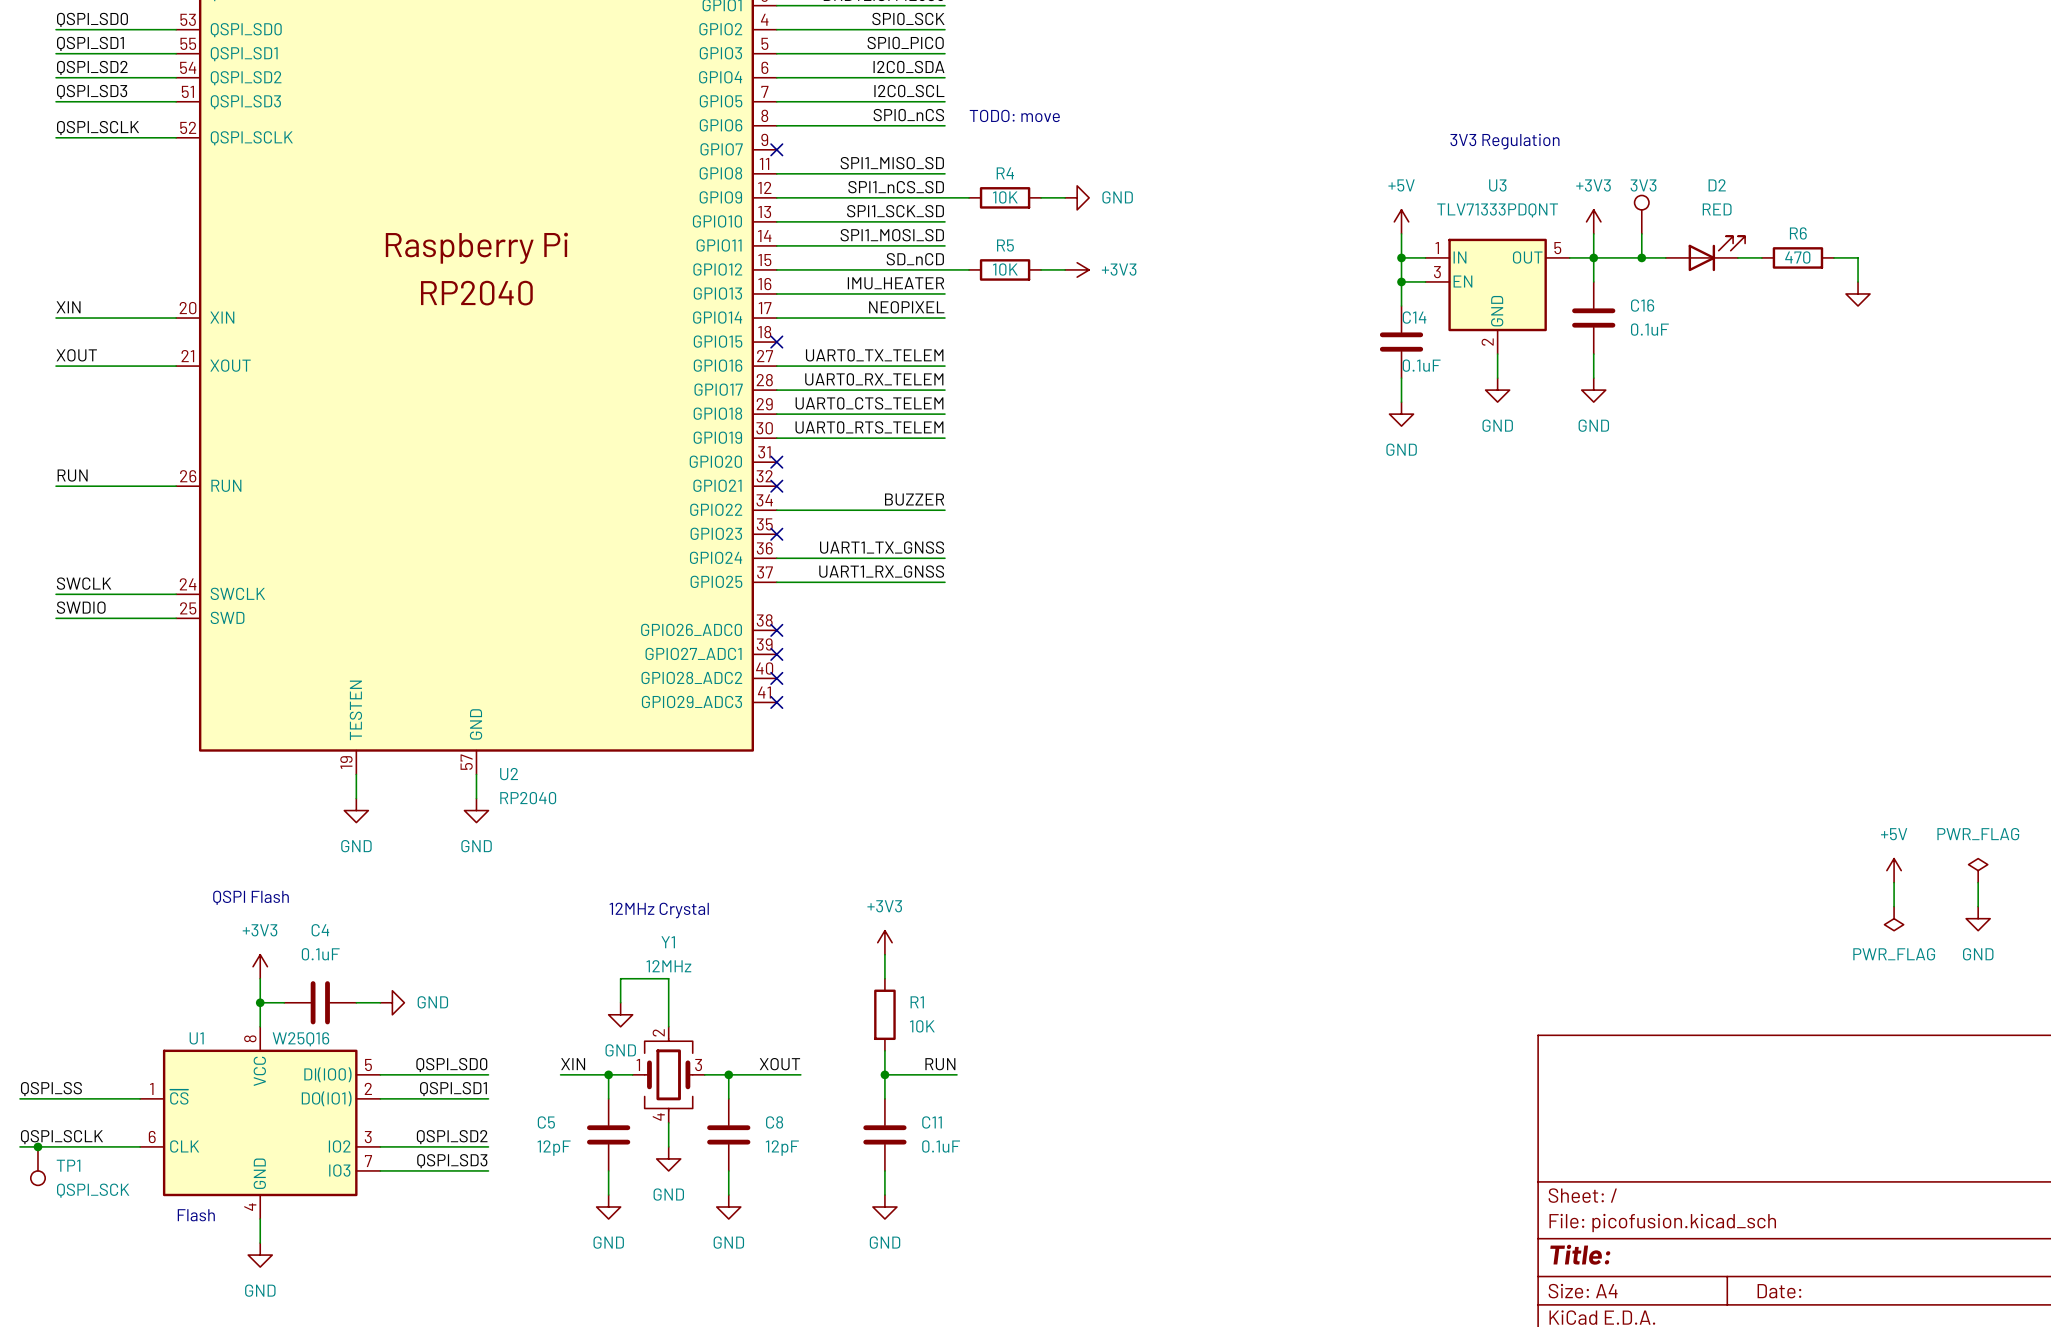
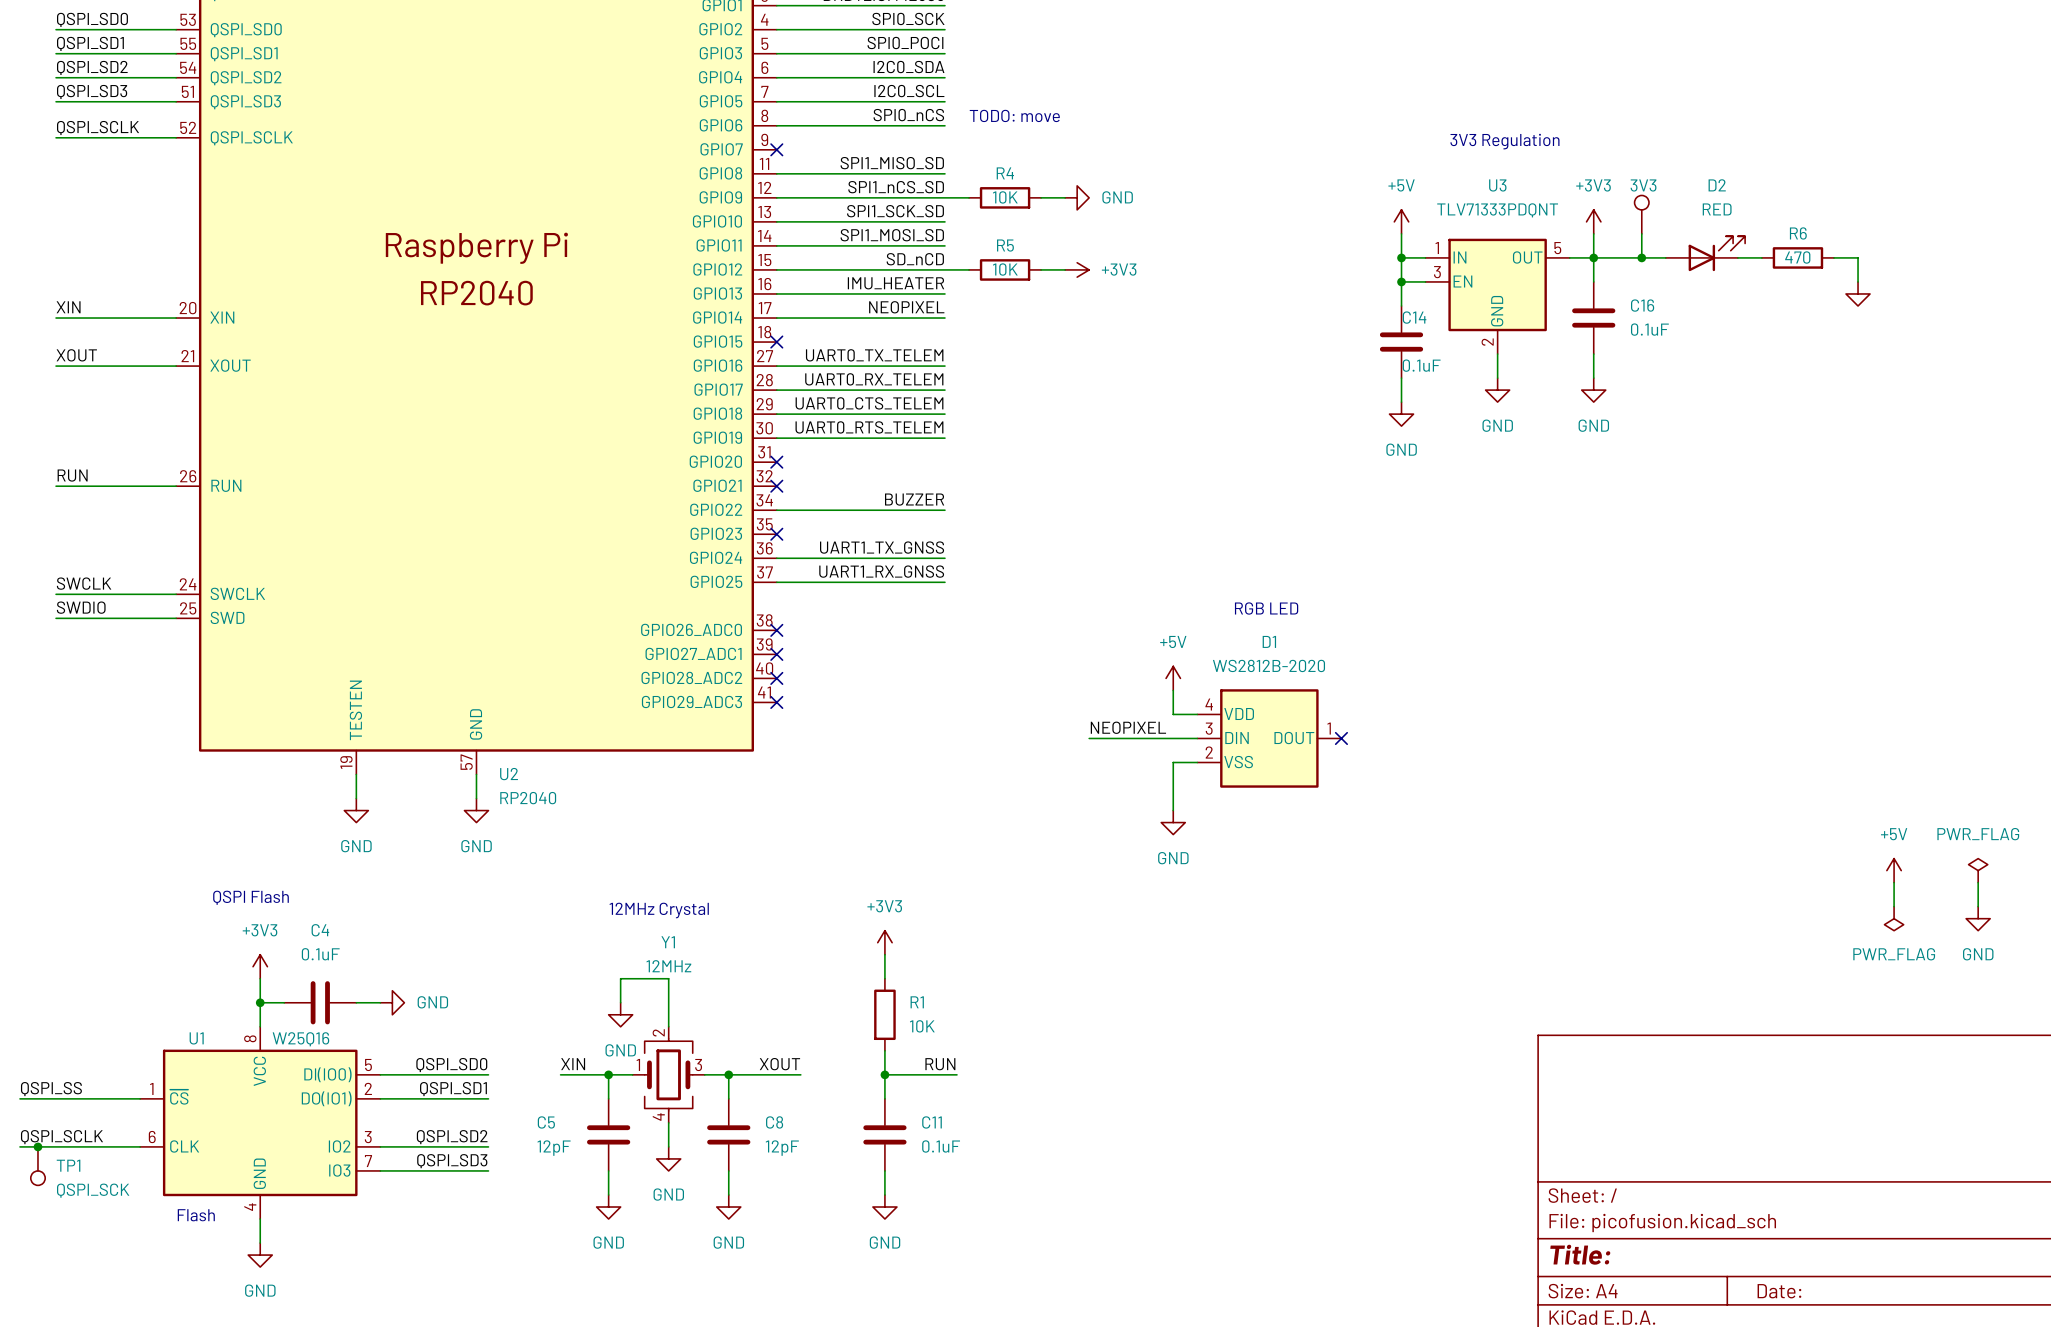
label: SPI0_PICO (905, 43) -> SPI0_POCI (905, 43)
text: none -> RGB LED (1266, 608)
power symbol: none -> +5V (1173, 678)
wire: none -> (1173, 690) (1173, 714) (1197, 714)
label: none -> NEOPIXEL (1128, 727)
wire: none -> (1089, 738) (1197, 738)
D1: none -> WS2812B-2020 (1269, 738)
no-connect mark: none -> (1341, 738)
wire: none -> (1197, 762) (1173, 762) (1173, 810)
power symbol: none -> GND (1173, 822)

